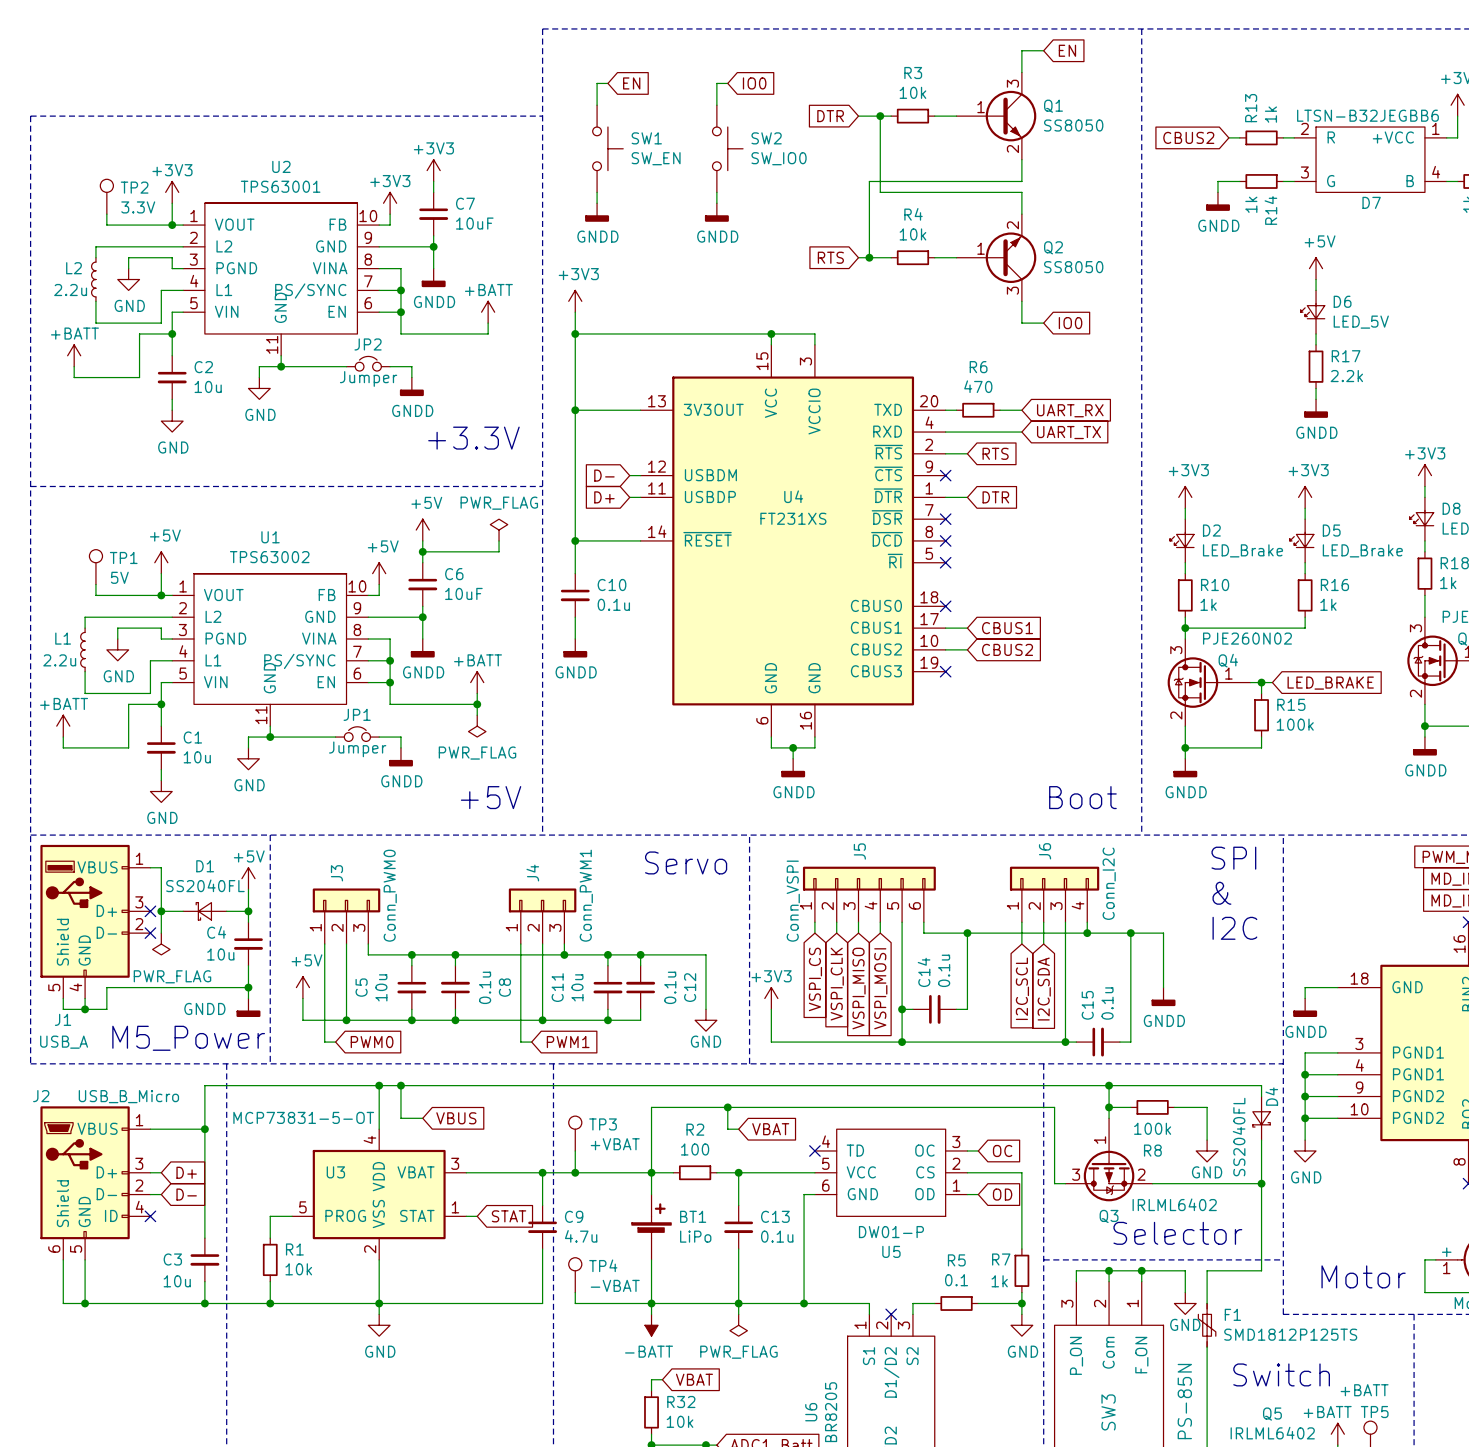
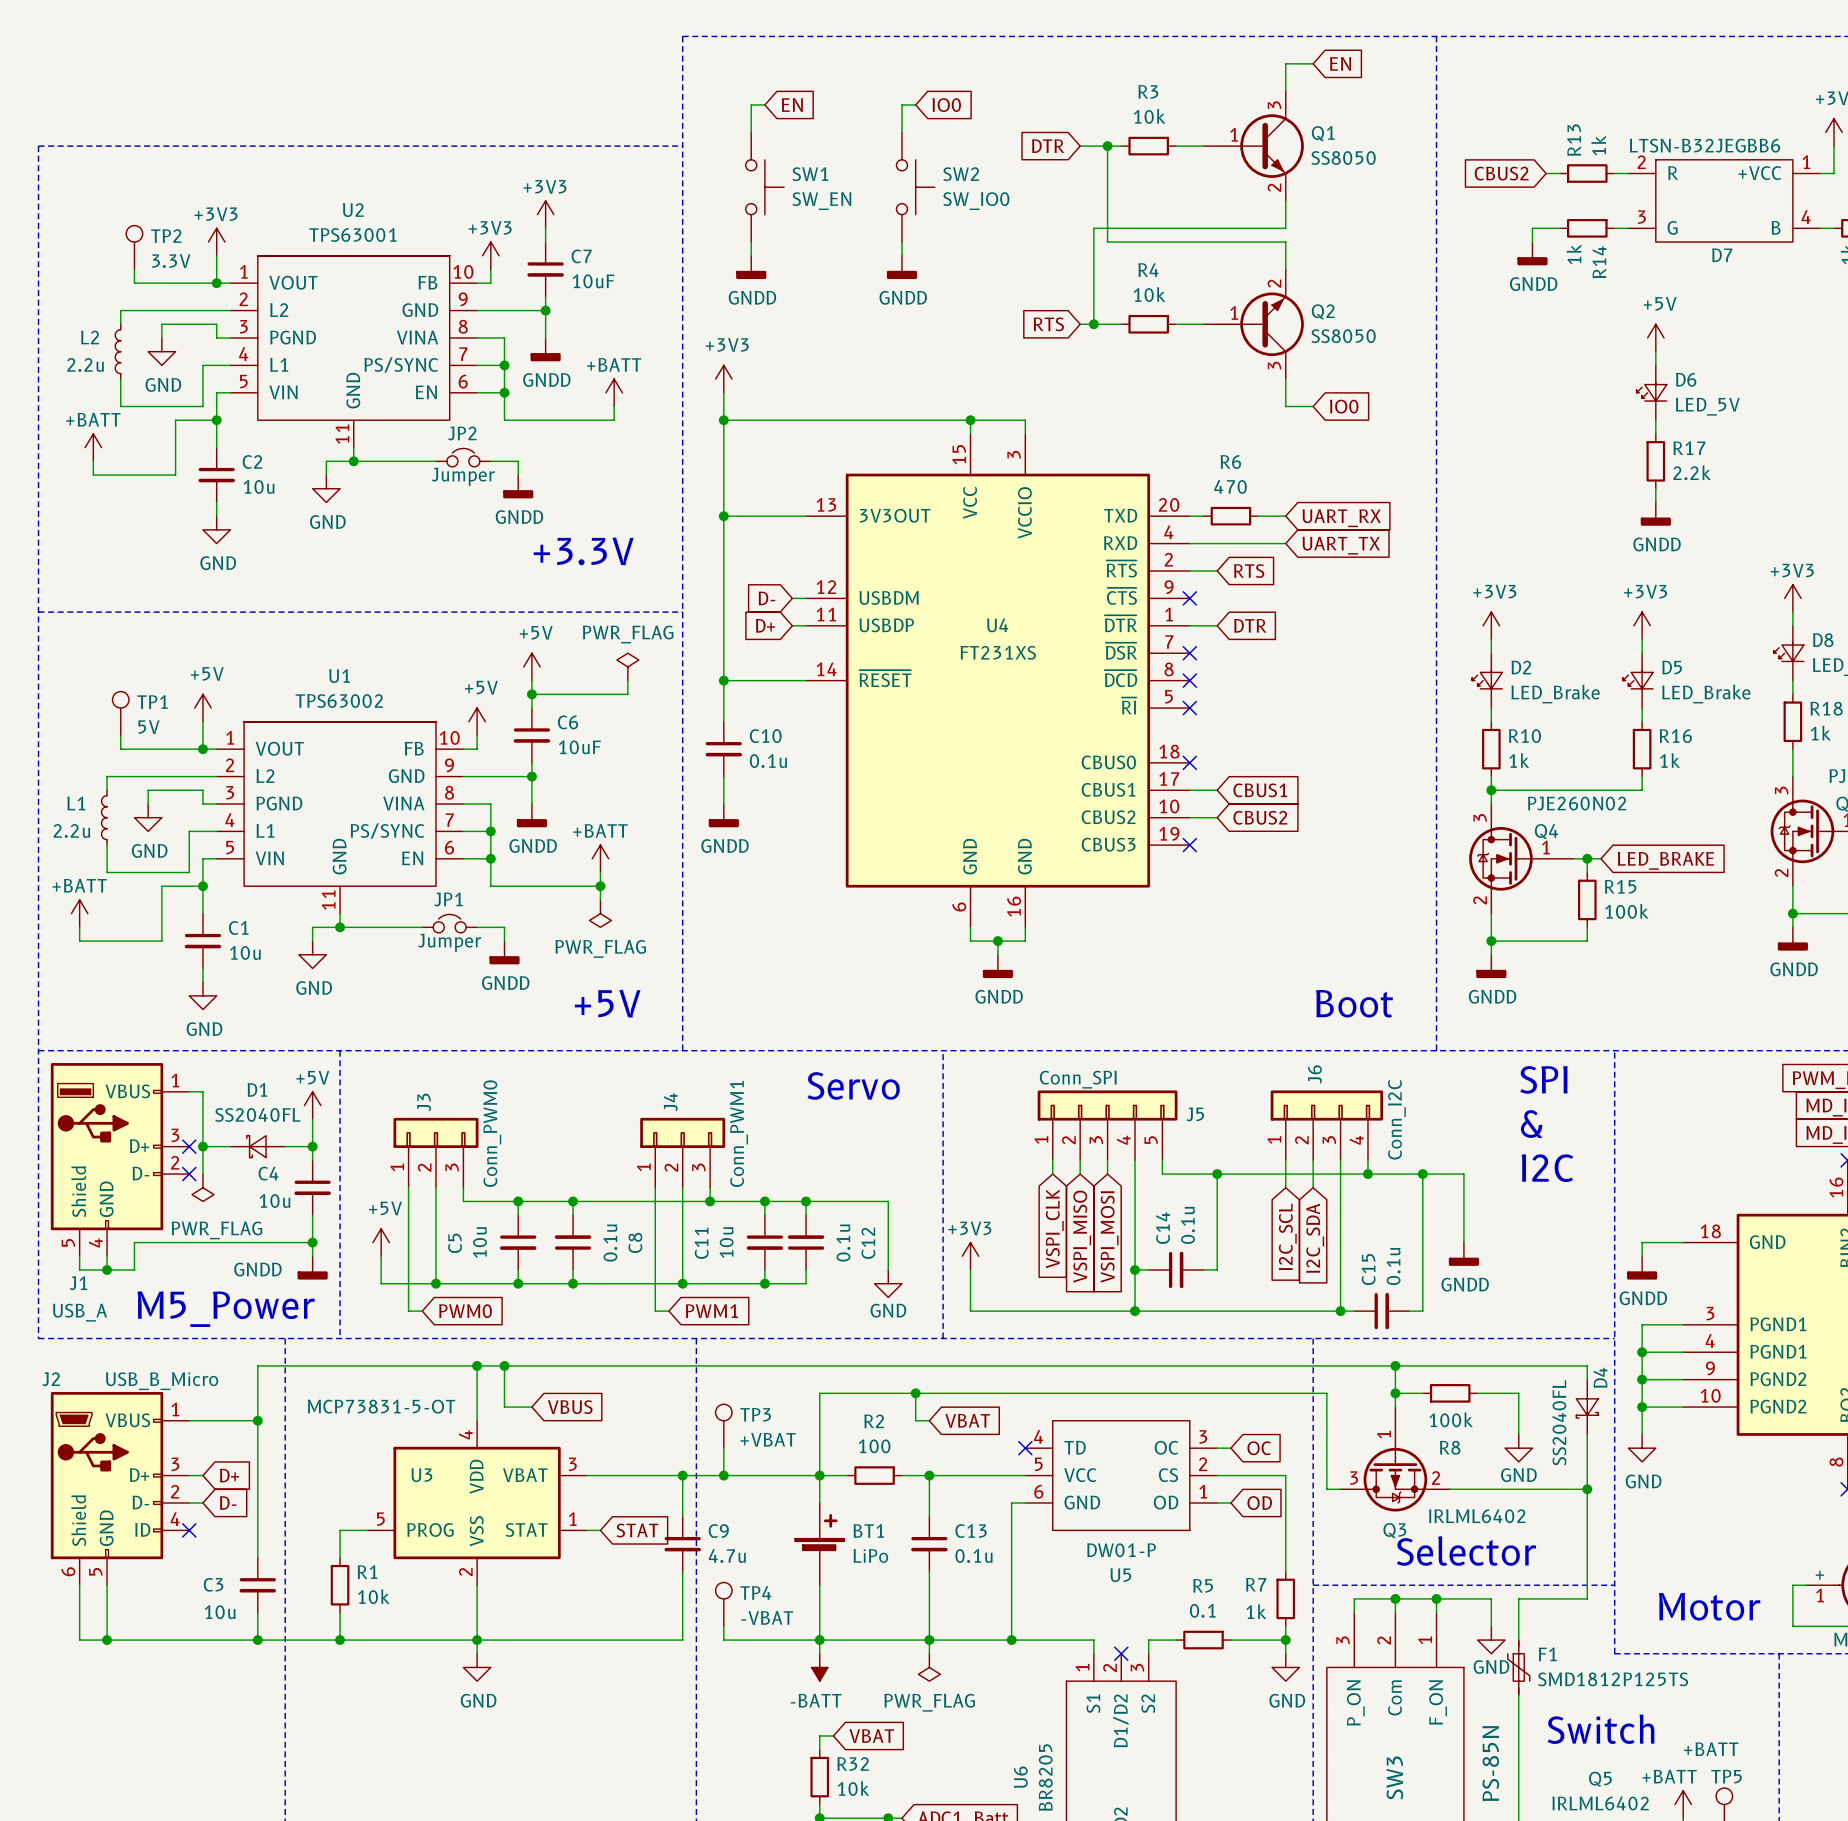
J5 name position: J5 (859, 851) -> J5 (1195, 1114)
J5 symbol: [802, 866, 936, 923] -> [1037, 1090, 1178, 1161]
J5 value: Conn_VSPI (793, 901) -> Conn_SPI (1078, 1079)
wire: (814, 922) (814, 933) -> none
global label: VSPI_CS (815, 979) -> none

